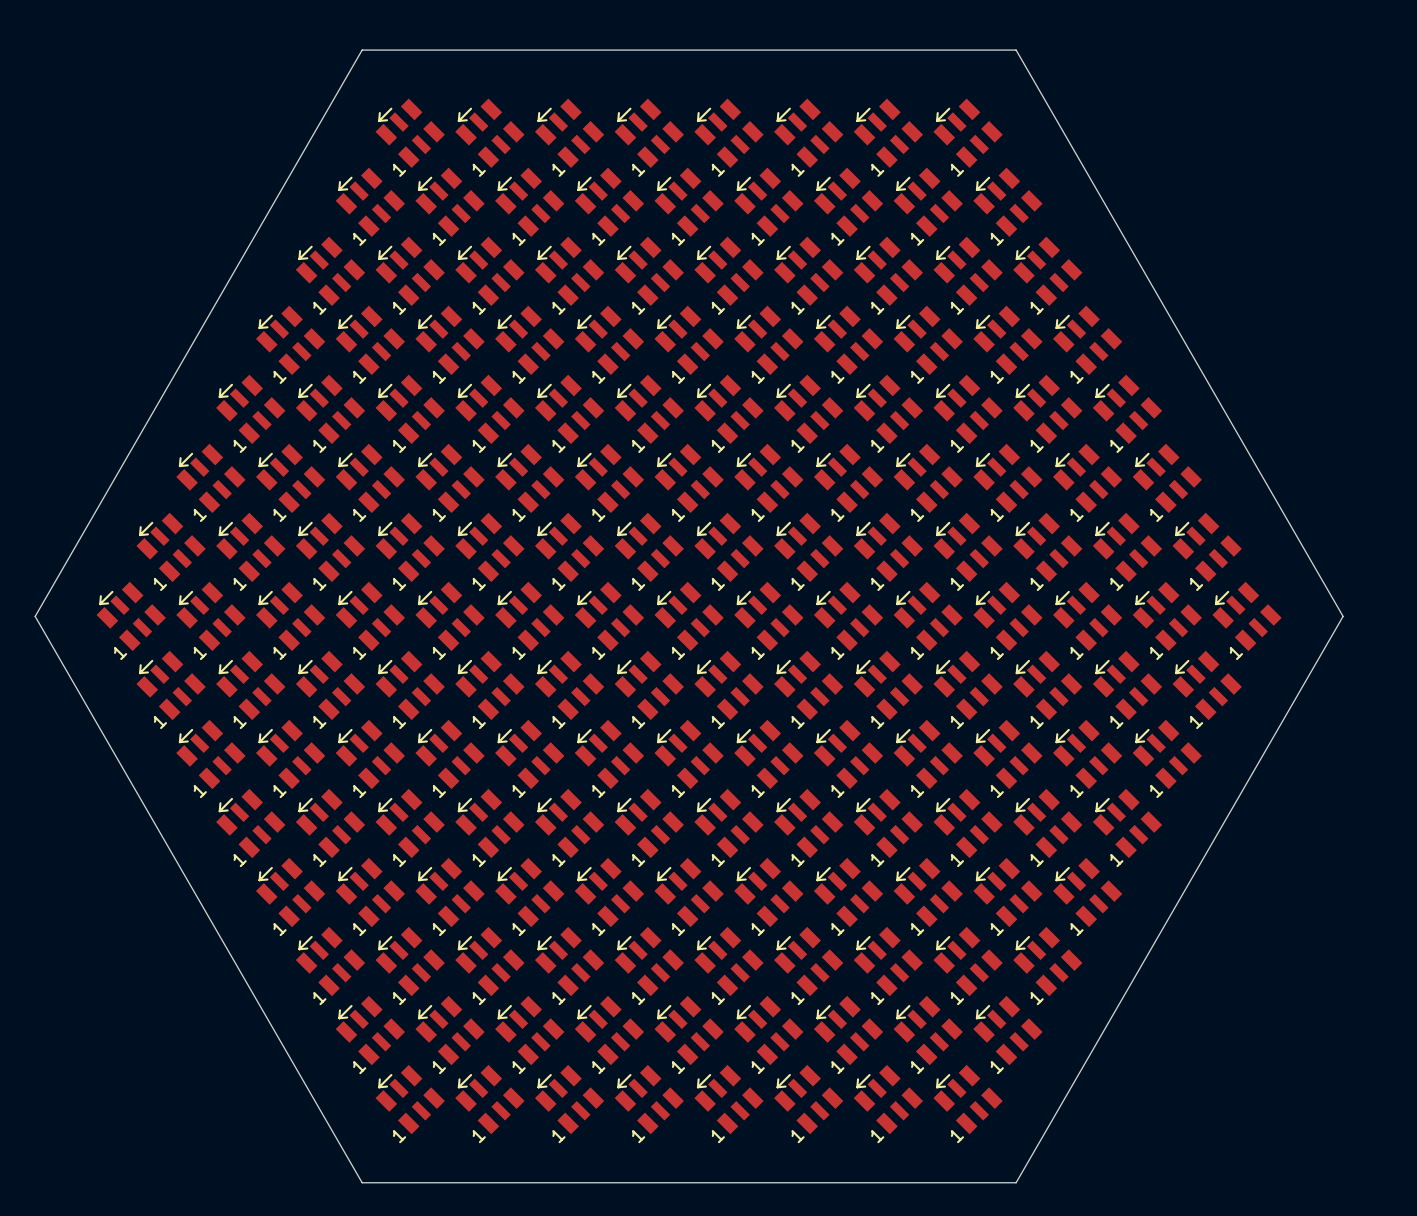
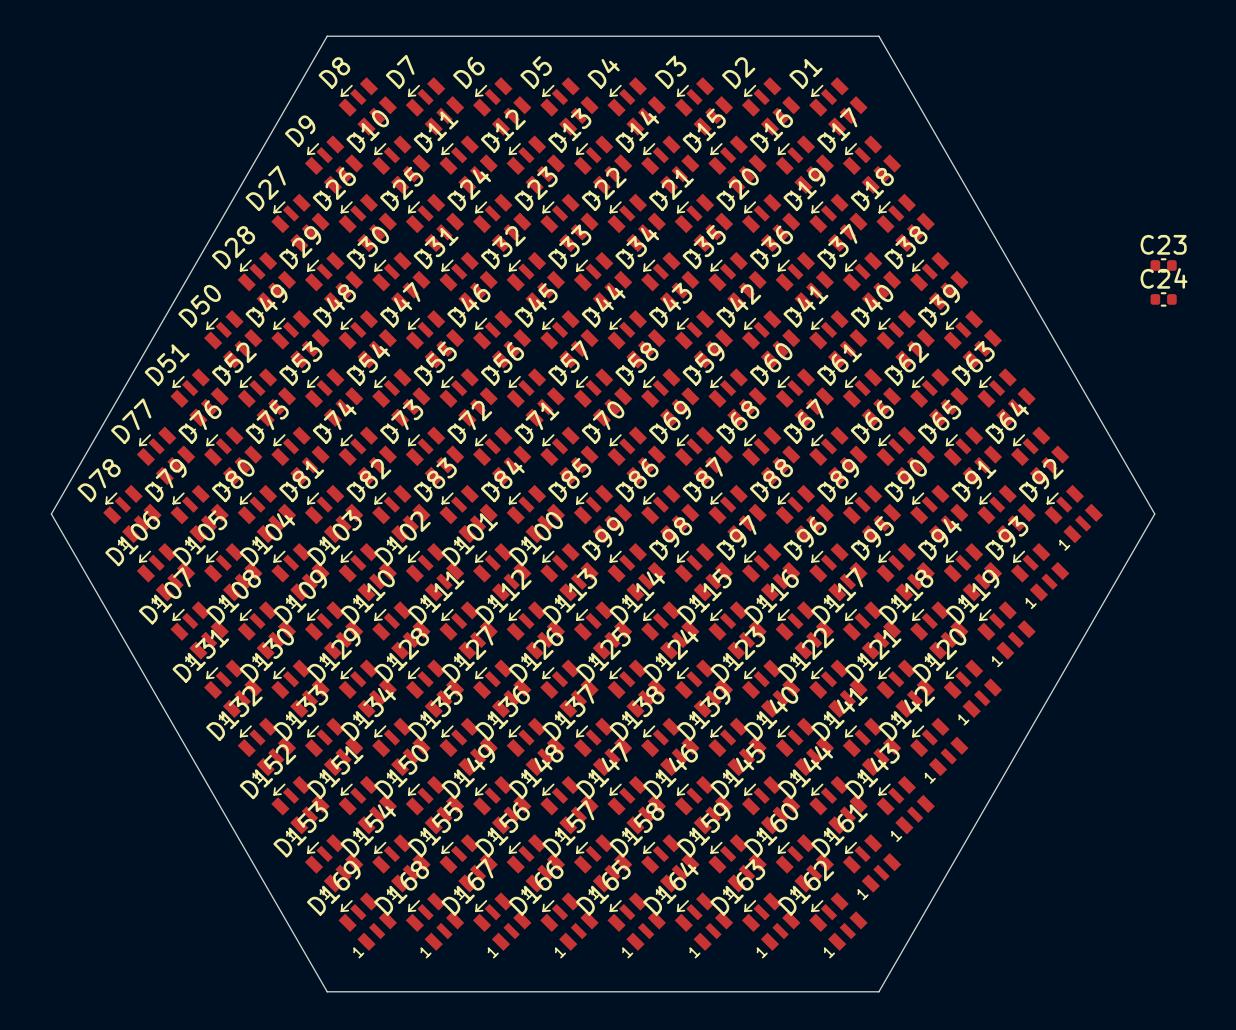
D7 name: none -> D7 (400, 71)
D5 name: none -> D5 (536, 72)
D3 name: none -> D3 (670, 72)
D8 name: none -> D8 (334, 73)
D6 name: none -> D6 (468, 72)
D2 name: none -> D2 (738, 73)
D4 name: none -> D4 (603, 73)
D1 name: none -> D1 (805, 73)
D13 name: none -> D13 (569, 130)
D17 name: none -> D17 (837, 130)
D9 name: none -> D9 (300, 131)
D12 name: none -> D12 (503, 131)
D15 name: none -> D15 (704, 130)
D16 name: none -> D16 (771, 130)
D10 name: none -> D10 (367, 131)
D11 name: none -> D11 (436, 132)
D14 name: none -> D14 (637, 132)
D27 name: none -> D27 (265, 188)
D23 name: none -> D23 (536, 188)
D26 name: none -> D26 (334, 189)
D25 name: none -> D25 (401, 188)
D22 name: none -> D22 (604, 189)
D19 name: none -> D19 (804, 189)
D18 name: none -> D18 (872, 189)
D24 name: none -> D24 (469, 190)
D21 name: none -> D21 (671, 190)
D20 name: none -> D20 (737, 189)
D33 name: none -> D33 (569, 246)
D37 name: none -> D37 (837, 246)
D28 name: none -> D28 (233, 247)
D29 name: none -> D29 (300, 247)
D32 name: none -> D32 (503, 247)
D35 name: none -> D35 (704, 247)
D36 name: none -> D36 (771, 247)
D38 name: none -> D38 (905, 247)
D30 name: none -> D30 (367, 247)
D31 name: none -> D31 (436, 248)
D34 name: none -> D34 (637, 248)
C23: none -> (1163, 265)
C24: none -> (1163, 299)
D47 name: none -> D47 (400, 304)
D43 name: none -> D43 (670, 305)
D49 name: none -> D49 (266, 305)
D48 name: none -> D48 (334, 305)
D46 name: none -> D46 (468, 305)
D45 name: none -> D45 (536, 305)
D42 name: none -> D42 (738, 305)
D39 name: none -> D39 (938, 305)
D50 name: none -> D50 (199, 306)
D44 name: none -> D44 (603, 306)
D41 name: none -> D41 (805, 306)
D40 name: none -> D40 (872, 306)
D53 name: none -> D53 (300, 363)
D57 name: none -> D57 (568, 362)
D63 name: none -> D63 (973, 363)
D52 name: none -> D52 (234, 364)
D55 name: none -> D55 (435, 363)
D56 name: none -> D56 (502, 363)
D58 name: none -> D58 (636, 364)
D59 name: none -> D59 (703, 364)
D62 name: none -> D62 (906, 364)
D51 name: none -> D51 (167, 365)
D54 name: none -> D54 (368, 365)
D60 name: none -> D60 (771, 364)
D61 name: none -> D61 (839, 365)
D77 name: none -> D77 (131, 421)
D73 name: none -> D73 (401, 421)
D67 name: none -> D67 (803, 421)
D76 name: none -> D76 (199, 422)
D75 name: none -> D75 (267, 421)
D72 name: none -> D72 (469, 422)
D69 name: none -> D69 (670, 422)
D68 name: none -> D68 (737, 422)
D66 name: none -> D66 (872, 422)
D65 name: none -> D65 (939, 421)
D74 name: none -> D74 (334, 423)
D71 name: none -> D71 (536, 423)
D70 name: none -> D70 (603, 422)
D64 name: none -> D64 (1007, 423)
D83 name: none -> D83 (435, 479)
D87 name: none -> D87 (702, 479)
D78 name: none -> D78 (99, 480)
D79 name: none -> D79 (165, 480)
D82 name: none -> D82 (368, 480)
D85 name: none -> D85 (569, 480)
D86 name: none -> D86 (636, 480)
D88 name: none -> D88 (771, 480)
D89 name: none -> D89 (838, 480)
D92 name: none -> D92 (1041, 480)
D80 name: none -> D80 (233, 480)
D81 name: none -> D81 (301, 481)
D84 name: none -> D84 (502, 481)
D90 name: none -> D90 (905, 480)
D91 name: none -> D91 (974, 481)
D103 name: none -> D103 (334, 537)
D97 name: none -> D97 (736, 537)
D93 name: none -> D93 (1006, 537)
D106 name: none -> D106 (132, 538)
D105 name: none -> D105 (199, 538)
D102 name: none -> D102 (402, 538)
D99 name: none -> D99 (602, 538)
D98 name: none -> D98 (670, 538)
D96 name: none -> D96 (805, 538)
D95 name: none -> D95 (872, 538)
D104 name: none -> D104 (267, 539)
D101 name: none -> D101 (469, 539)
D100 name: none -> D100 (535, 539)
D94 name: none -> D94 (939, 539)
D107 name: none -> D107 (164, 595)
D113 name: none -> D113 (569, 596)
D117 name: none -> D117 (837, 595)
D108 name: none -> D108 (233, 597)
D109 name: none -> D109 (300, 597)
D112 name: none -> D112 (503, 597)
D115 name: none -> D115 (704, 596)
D116 name: none -> D116 (771, 596)
D118 name: none -> D118 (905, 597)
D119 name: none -> D119 (972, 597)
D110 name: none -> D110 (367, 597)
D111 name: none -> D111 (436, 597)
D114 name: none -> D114 (637, 597)
D127 name: none -> D127 (467, 654)
D123 name: none -> D123 (737, 654)
D129 name: none -> D129 (333, 655)
D128 name: none -> D128 (401, 655)
D126 name: none -> D126 (536, 655)
D125 name: none -> D125 (603, 654)
D122 name: none -> D122 (805, 655)
D131 name: none -> D131 (200, 656)
D130 name: none -> D130 (266, 655)
D124 name: none -> D124 (670, 656)
D121 name: none -> D121 (873, 656)
D120 name: none -> D120 (939, 655)
D133 name: none -> D133 (300, 712)
D137 name: none -> D137 (568, 712)
D132 name: none -> D132 (234, 713)
D135 name: none -> D135 (435, 712)
D136 name: none -> D136 (502, 713)
D138 name: none -> D138 (636, 713)
D139 name: none -> D139 (703, 713)
D142 name: none -> D142 (906, 713)
D134 name: none -> D134 (368, 714)
D140 name: none -> D140 (771, 713)
D141 name: none -> D141 (839, 714)
D147 name: none -> D147 (601, 770)
D143 name: none -> D143 (872, 770)
D152 name: none -> D152 (268, 771)
D149 name: none -> D149 (468, 771)
D148 name: none -> D148 (536, 771)
D146 name: none -> D146 (670, 771)
D145 name: none -> D145 (737, 771)
D151 name: none -> D151 (335, 772)
D150 name: none -> D150 (401, 772)
D144 name: none -> D144 (805, 772)
D153 name: none -> D153 (300, 829)
D157 name: none -> D157 (568, 828)
D155 name: none -> D155 (435, 829)
D156 name: none -> D156 (502, 829)
D158 name: none -> D158 (636, 829)
D159 name: none -> D159 (703, 829)
D154 name: none -> D154 (368, 830)
D160 name: none -> D160 (771, 830)
D161 name: none -> D161 (839, 830)
D167 name: none -> D167 (467, 887)
D163 name: none -> D163 (737, 887)
D169 name: none -> D169 (333, 888)
D168 name: none -> D168 (401, 888)
D166 name: none -> D166 (536, 887)
D165 name: none -> D165 (603, 887)
D162 name: none -> D162 (805, 888)
D164 name: none -> D164 (670, 889)

